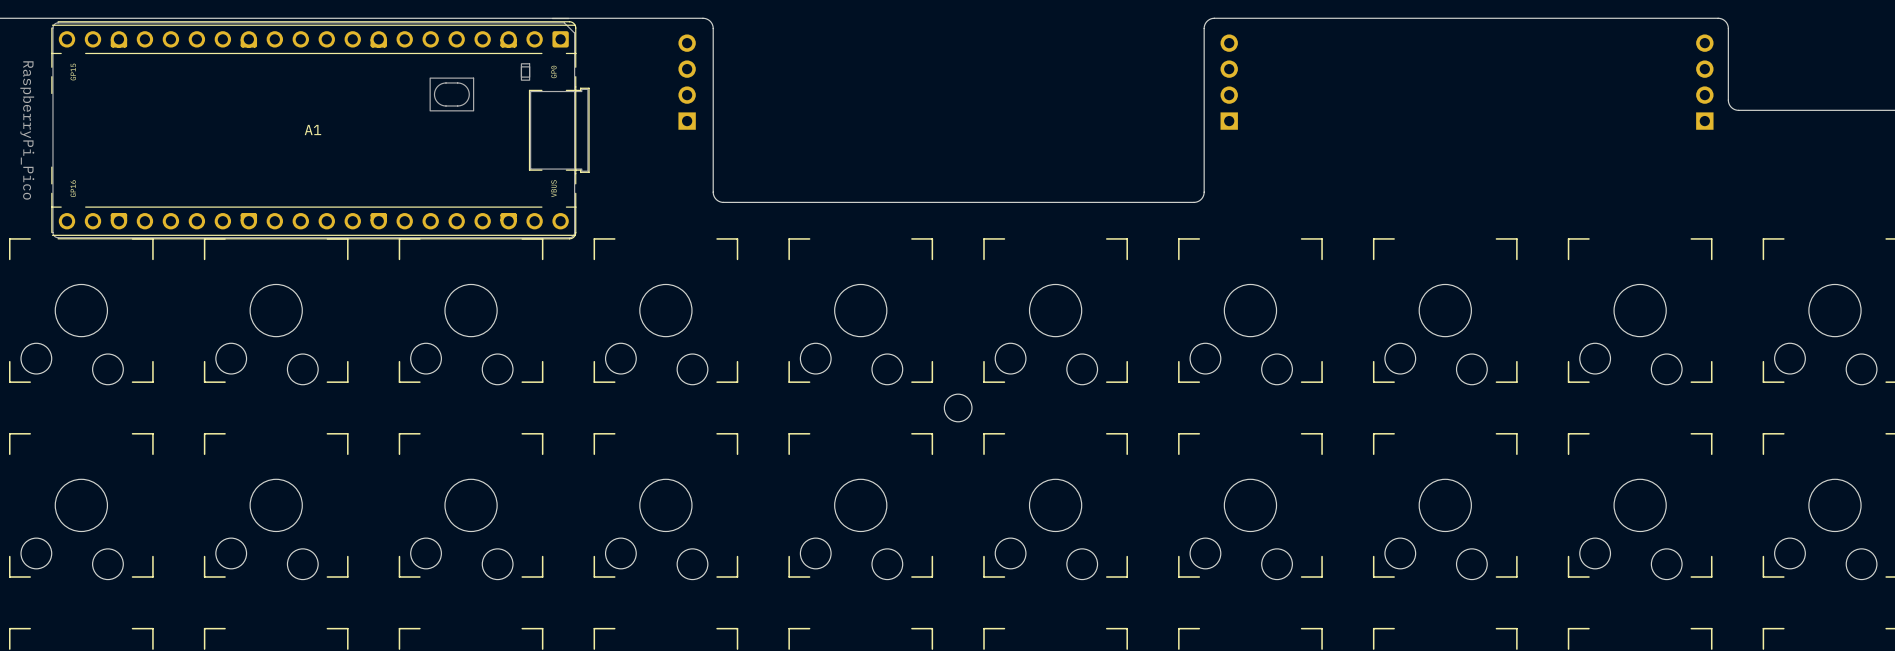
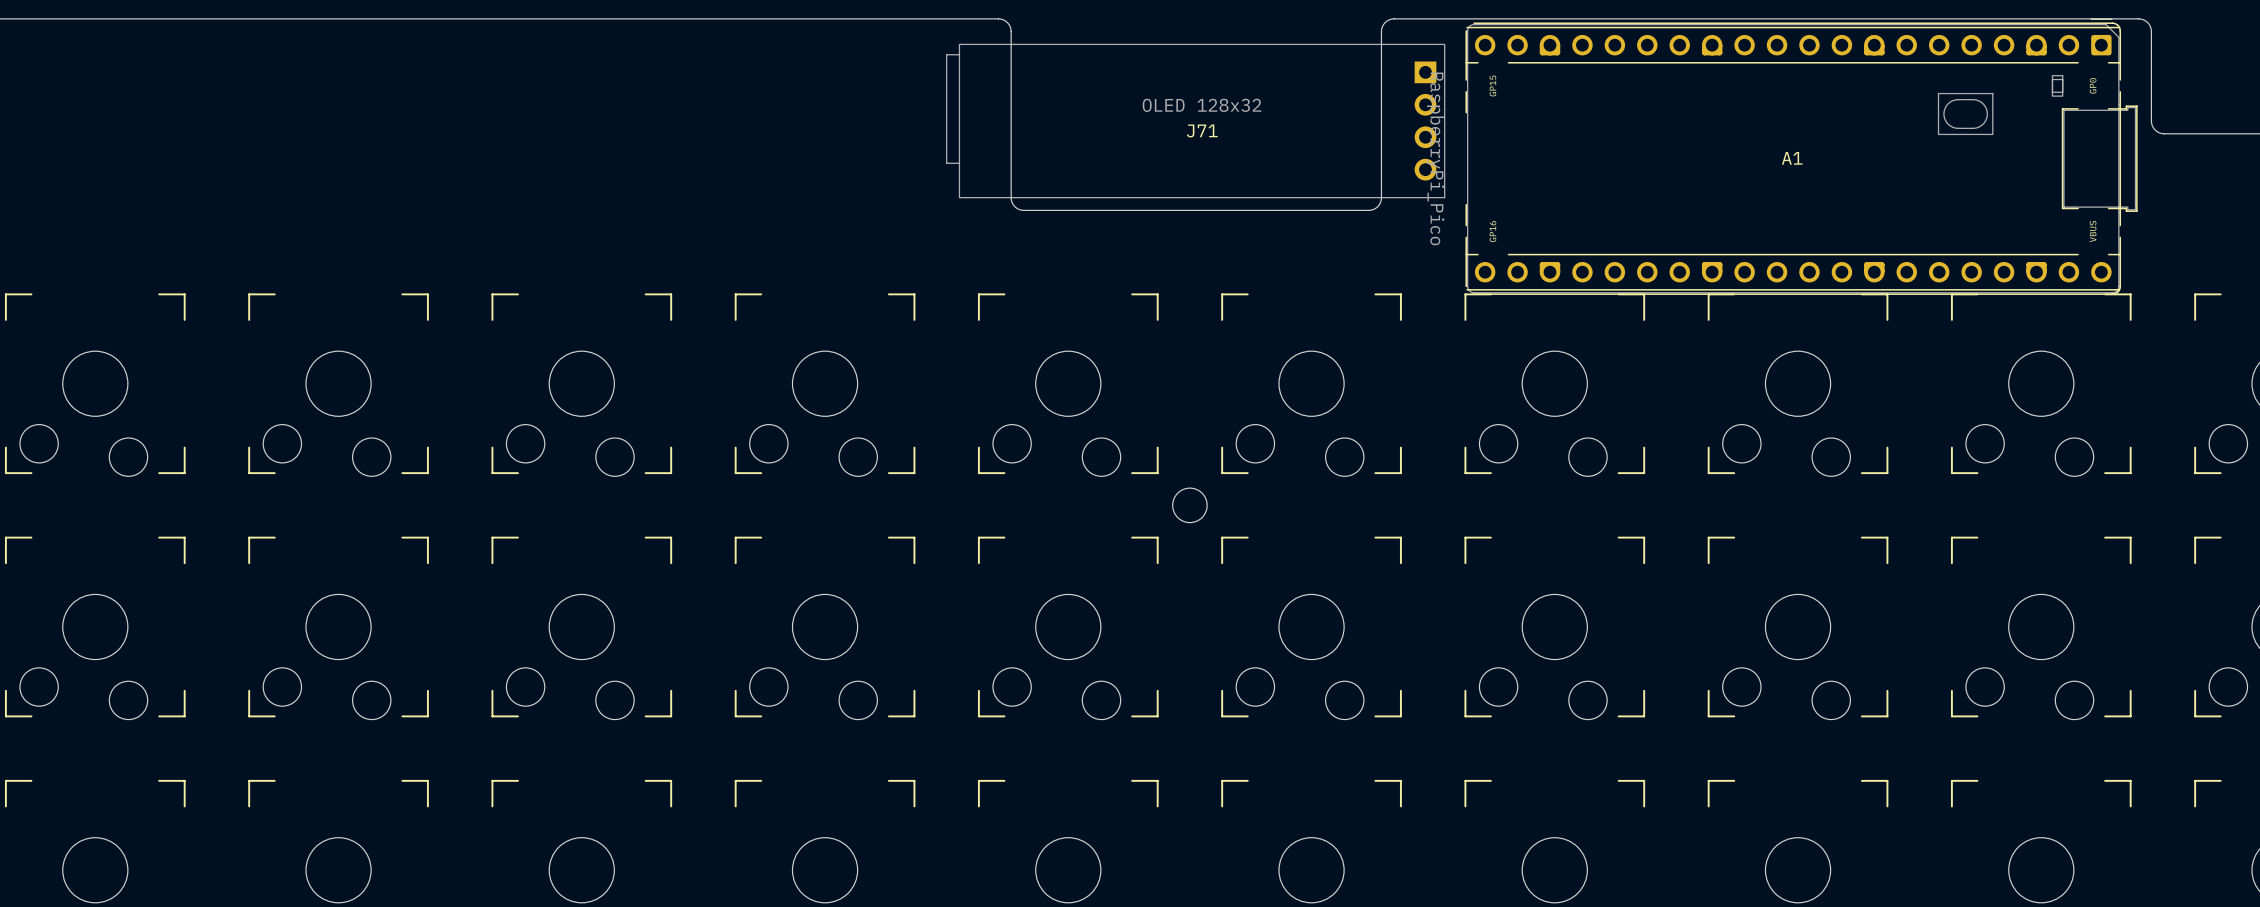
board edge: (702, 18) (710, 21) (713, 27) (713, 193) (716, 199) (723, 202) (1197, 201) (1201, 198) (1204, 192) (1204, 27) (1208, 20) (1214, 18) -> (871, 18) (998, 18) (1008, 23) (1011, 31) (1011, 199) (1014, 206) (1023, 210) (1372, 209) (1378, 205) (1381, 199) (1381, 31) (1384, 23) (1394, 18) (1509, 18)
part: (687, 82) -> none
part: (1229, 82) -> none
part: (1704, 82) -> none
J71: none -> OLED 128x32 (1195, 121)
A1 position: (320, 128) -> (1801, 156)

